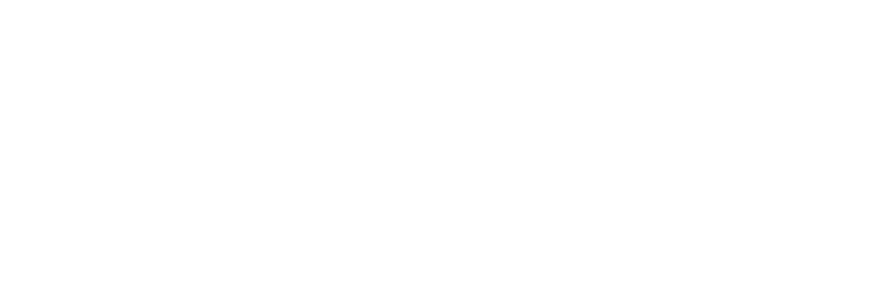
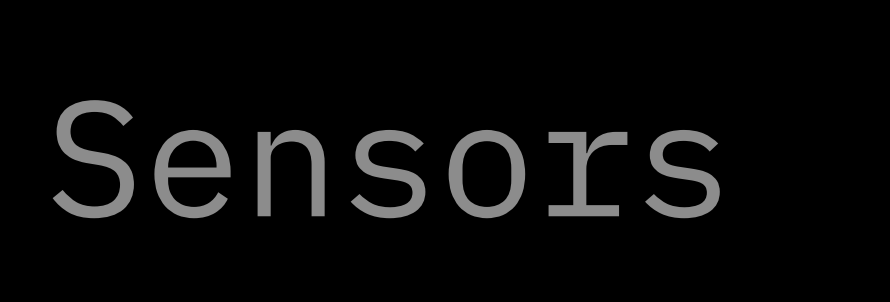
text: none -> Sensors (386, 159)

